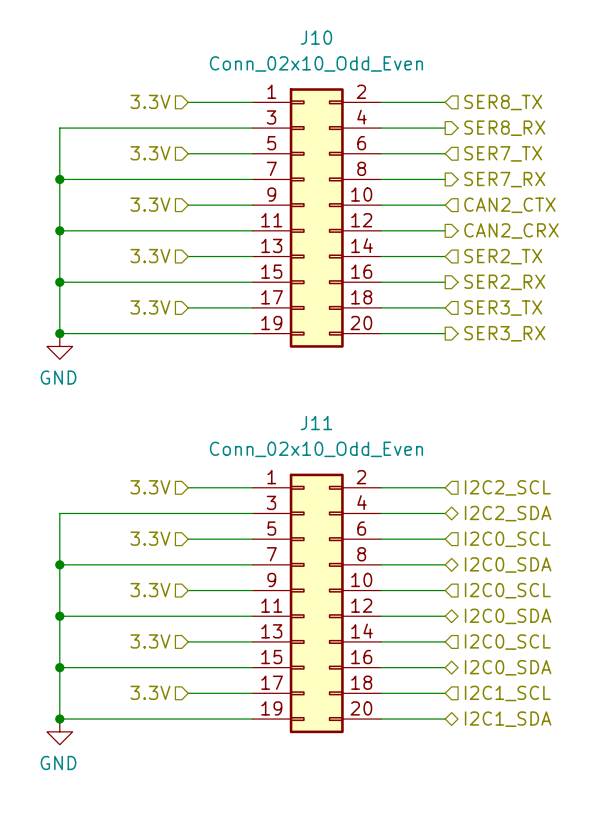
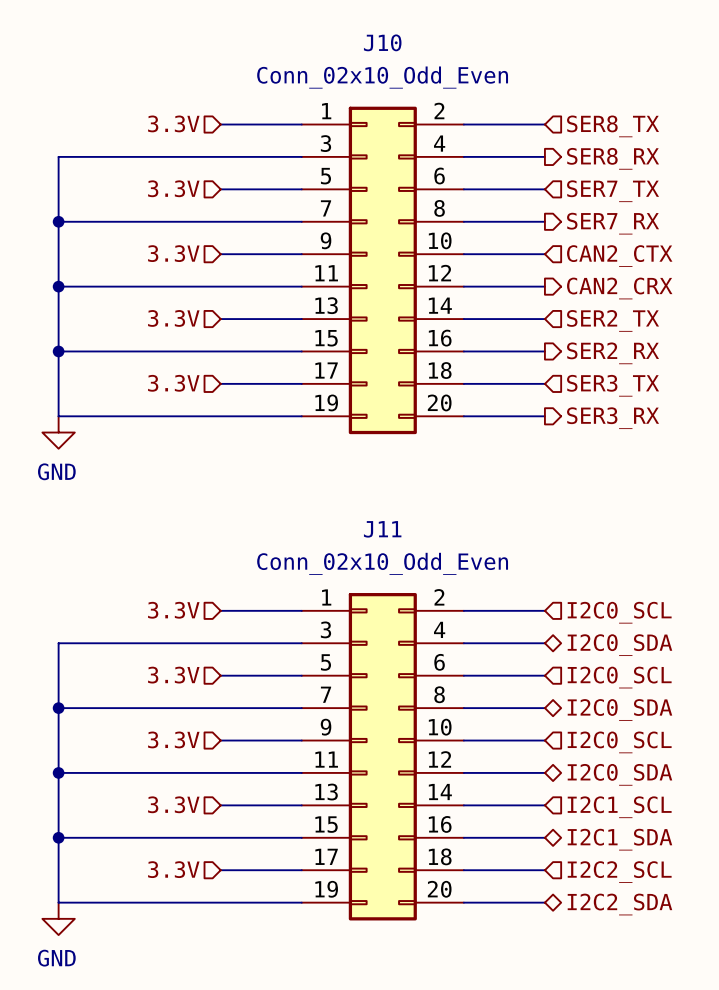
junction: (59, 333) -> none
hierarchical label: I2C2_SCL (507, 487) -> I2C0_SCL (619, 612)
hierarchical label: I2C2_SDA (508, 513) -> I2C0_SDA (619, 645)
hierarchical label: I2C0_SCL (507, 642) -> I2C1_SCL (619, 807)
hierarchical label: I2C0_SDA (508, 667) -> I2C1_SDA (619, 839)
hierarchical label: I2C1_SCL (507, 693) -> I2C2_SCL (619, 872)
junction: (59, 719) -> none
hierarchical label: I2C1_SDA (508, 719) -> I2C2_SDA (619, 904)

